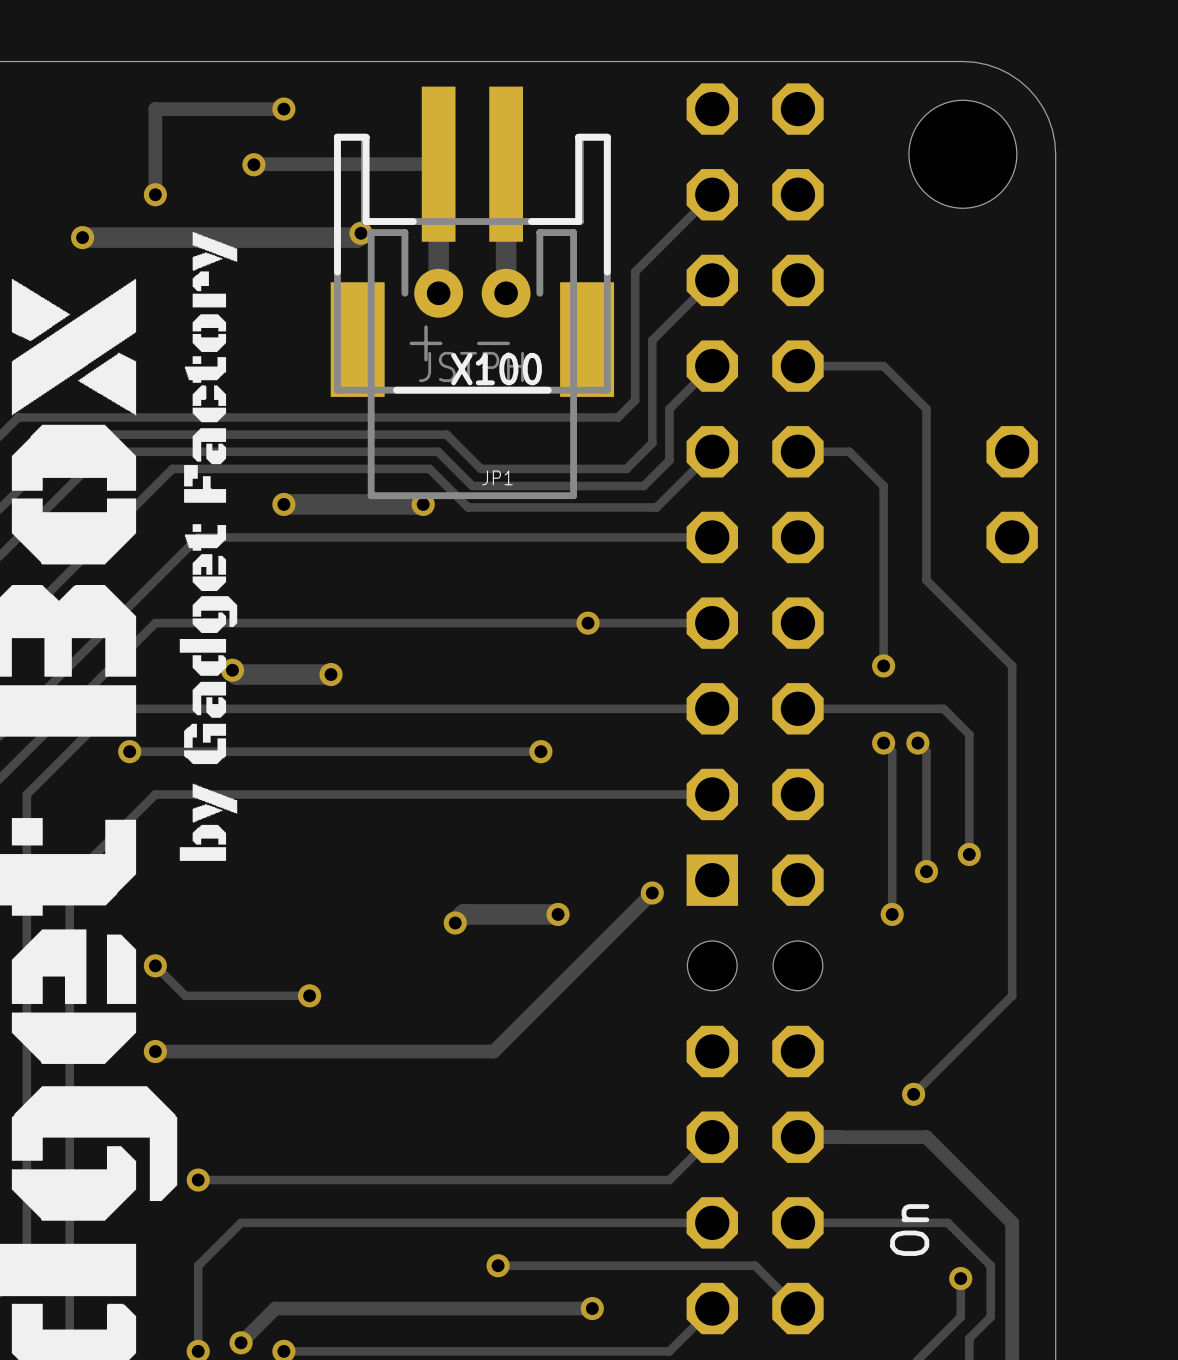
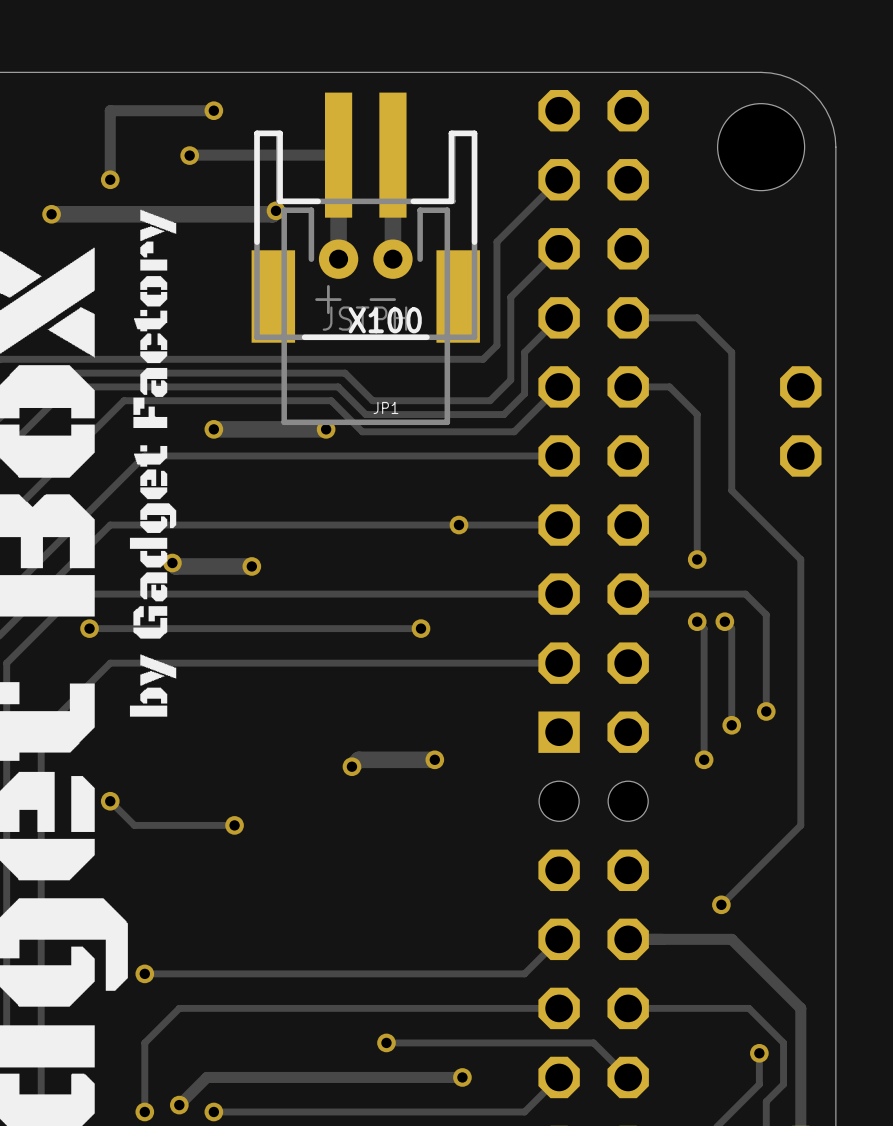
track: (652, 893) (493, 1051) (155, 1051) -> none
via: (652, 893) -> none
via: (155, 1051) -> none
text: On (909, 1230) -> none

